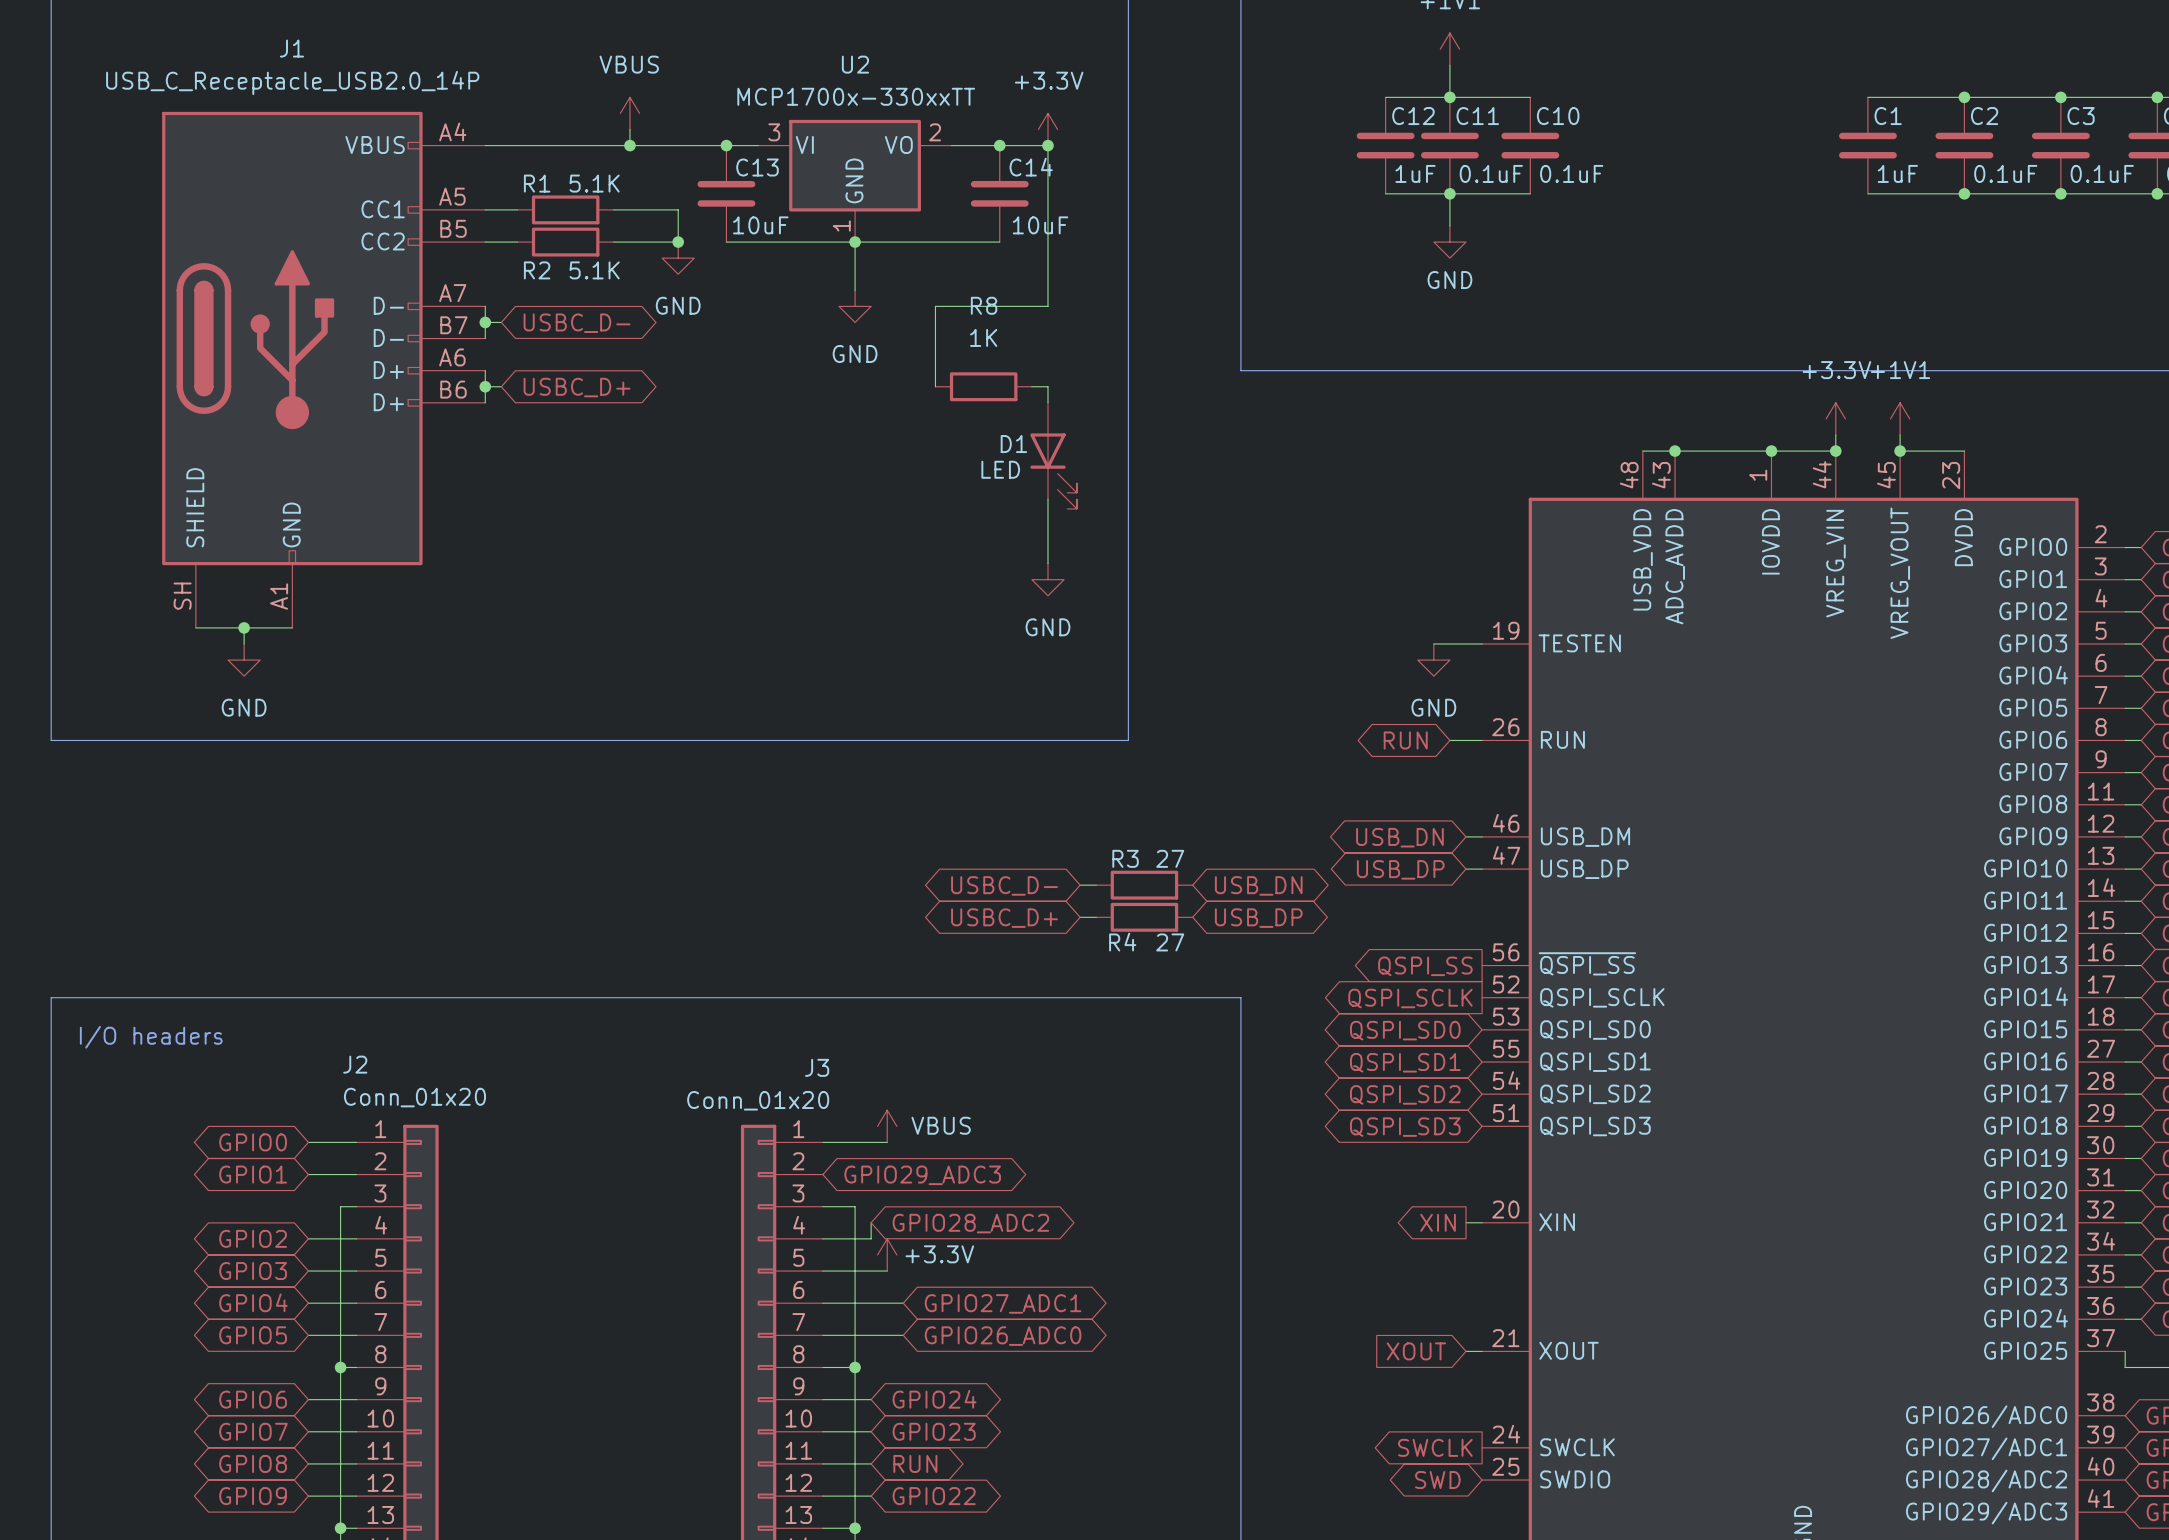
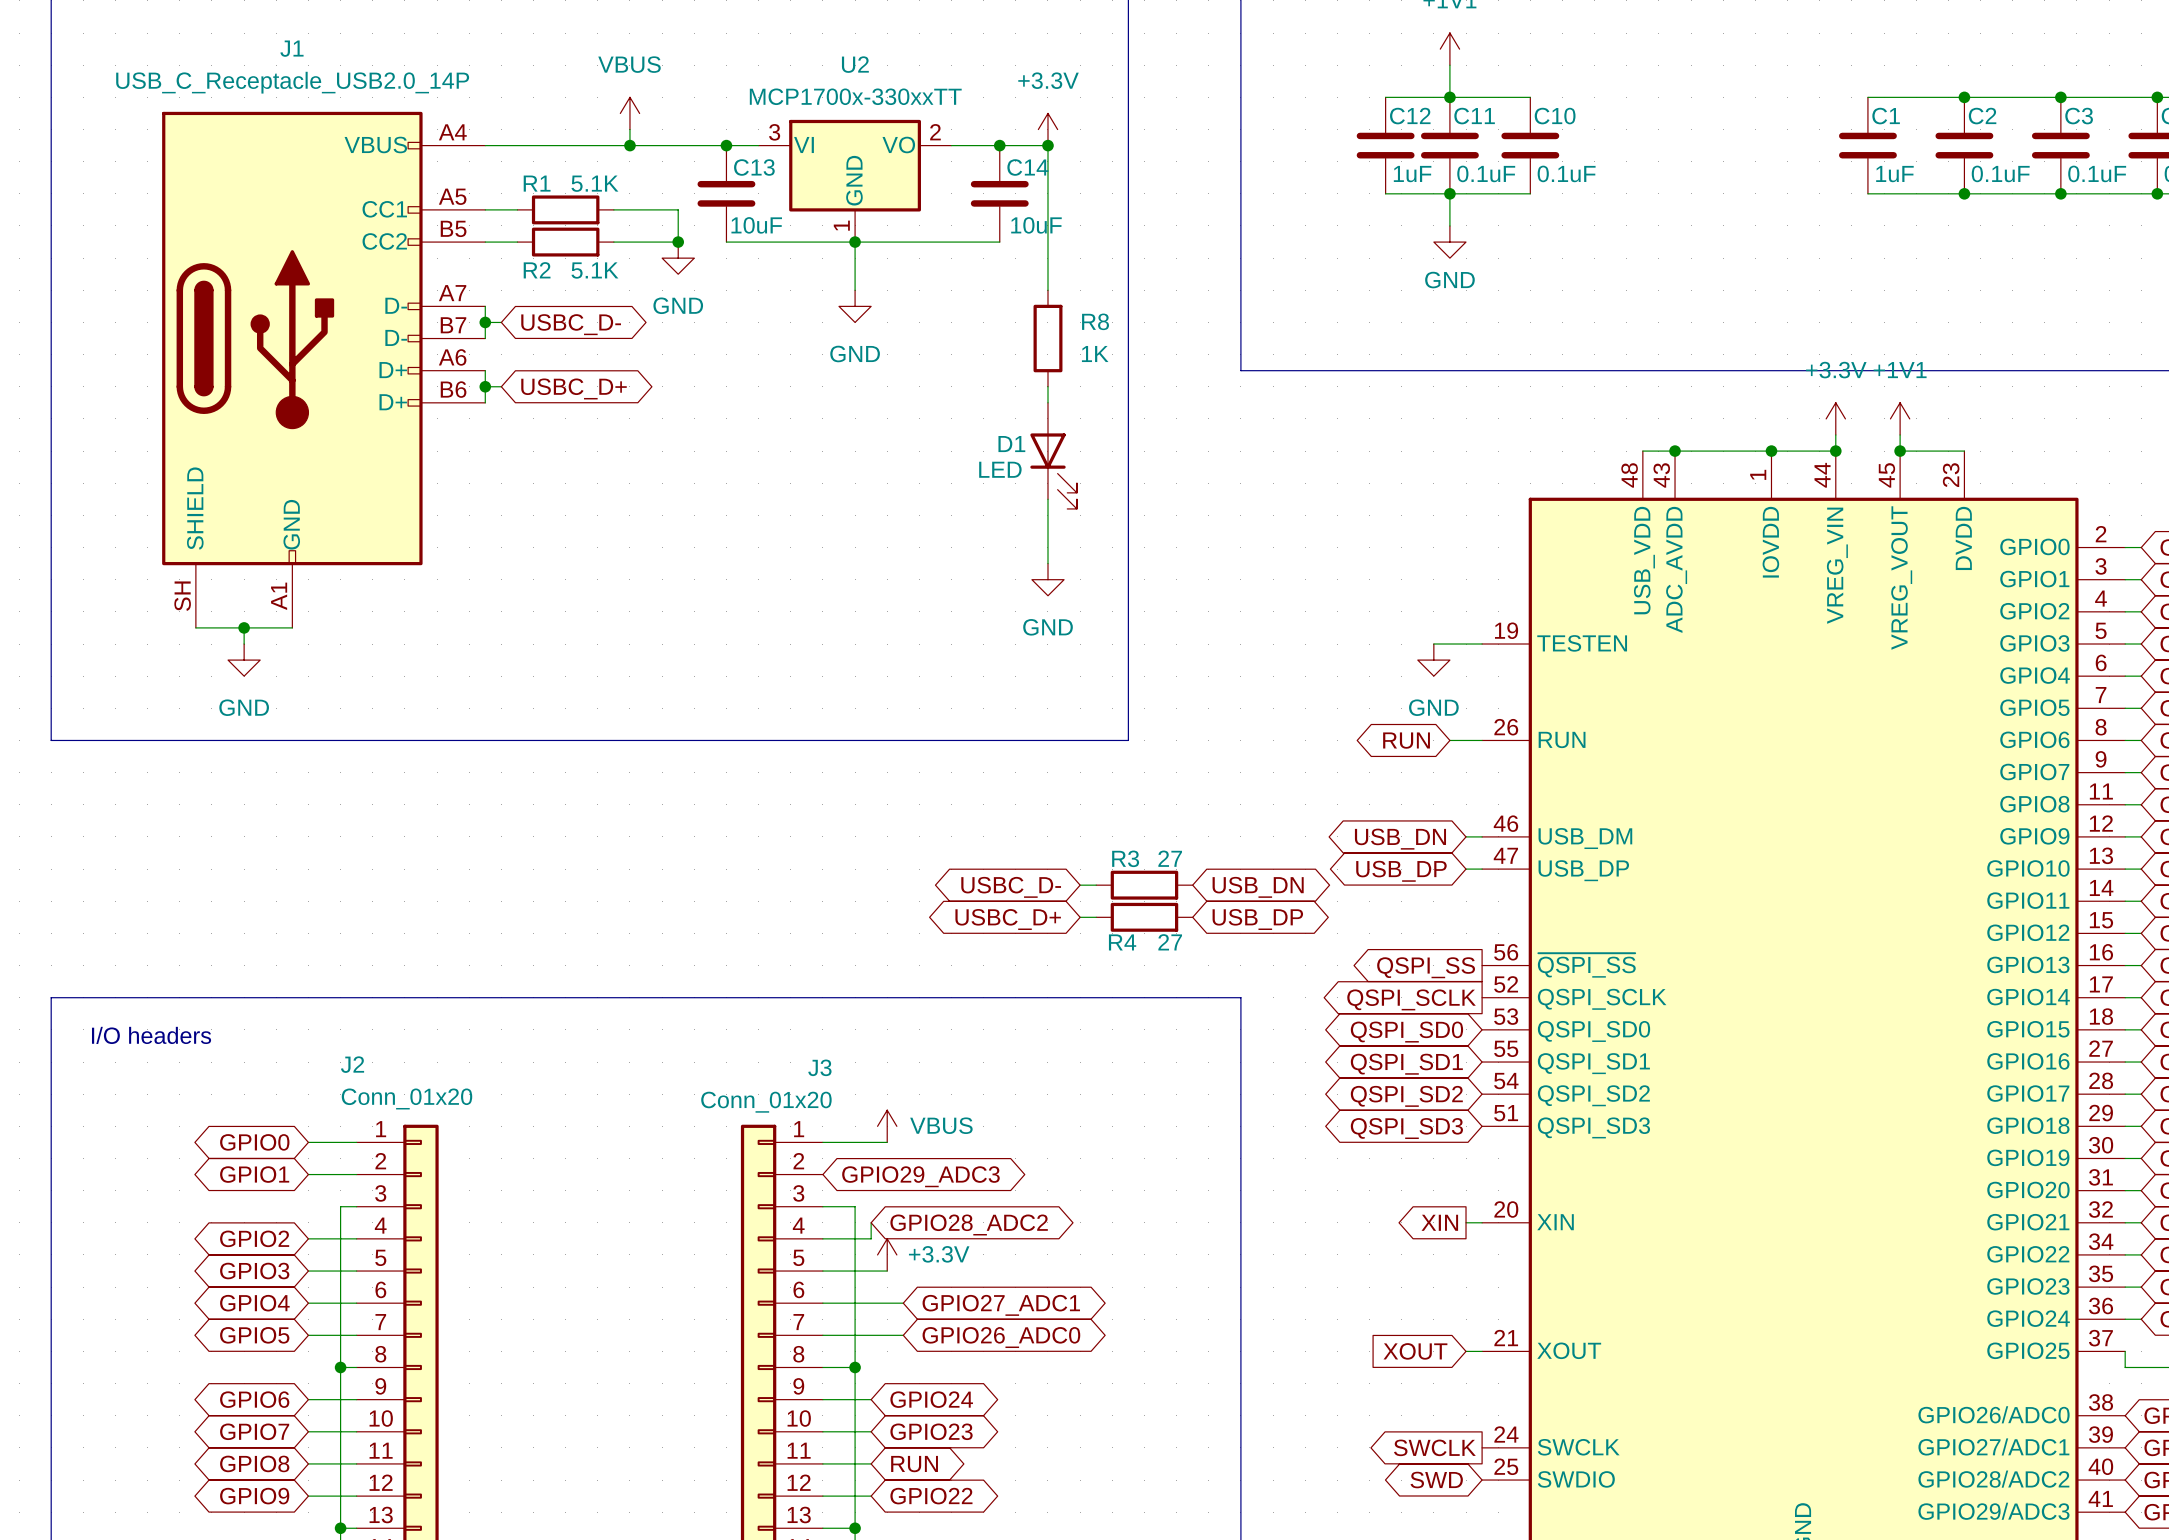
wire: (1047, 290) (1047, 306) (935, 306) (935, 386) -> none
R8 name position: R8 (984, 305) -> R8 (1095, 321)
R8 rotation: 0° (983, 386) -> 90° clockwise (1047, 338)
R8 position: (983, 386) -> (1047, 338)
wire: (1031, 386) (1047, 386) -> none

